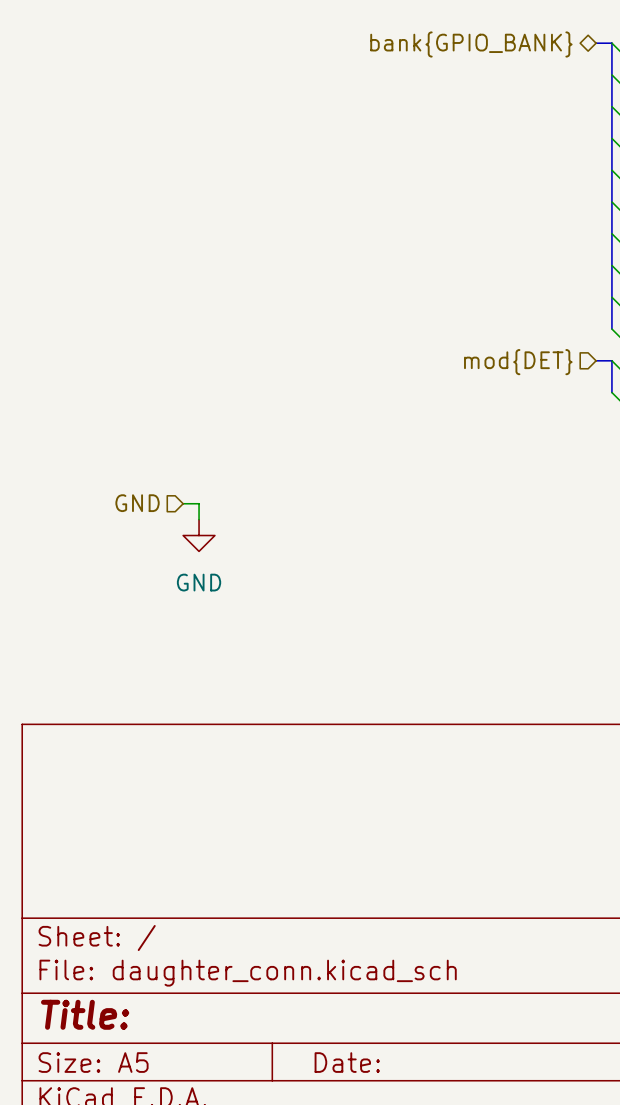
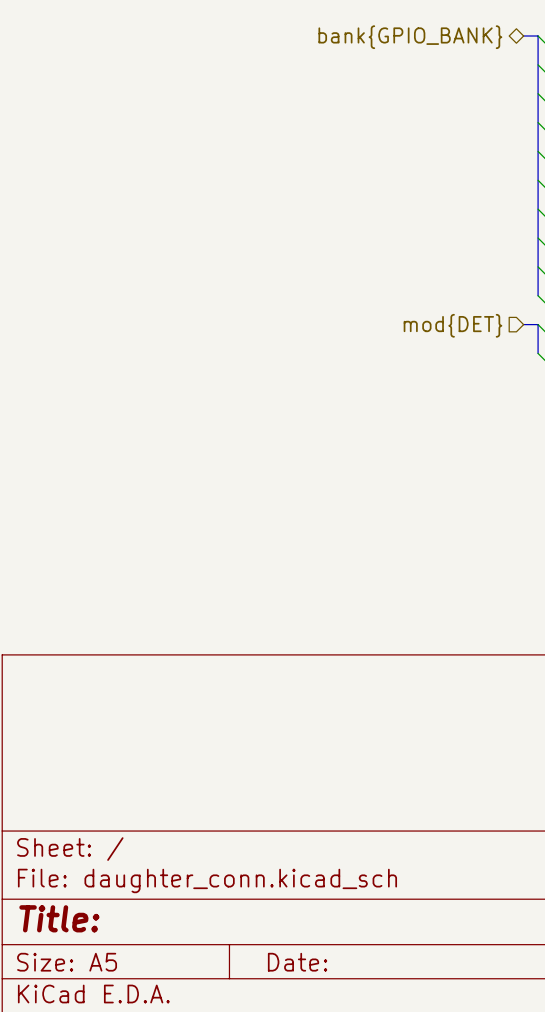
hierarchical label: GND (137, 503) -> none
wire: (183, 503) (199, 503) (199, 519) -> none
power symbol: GND (199, 535) -> none

